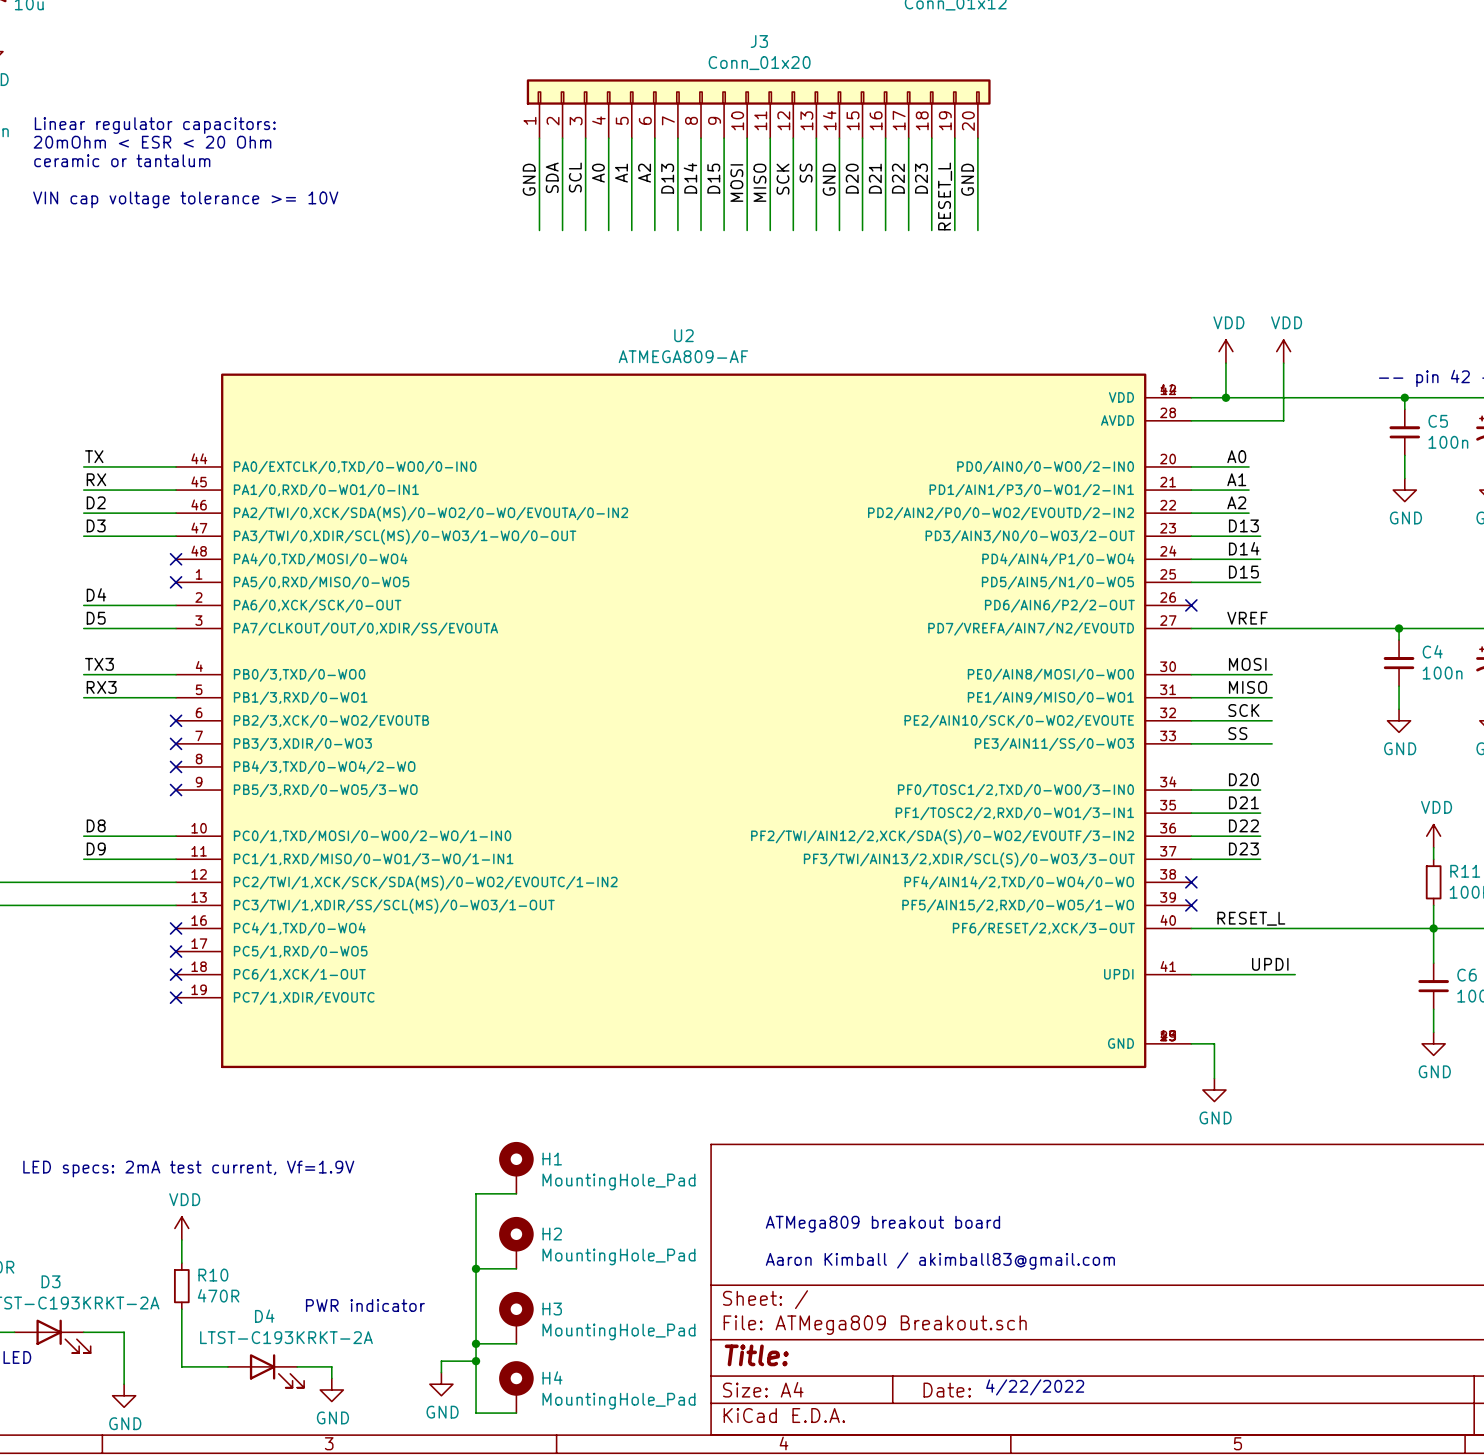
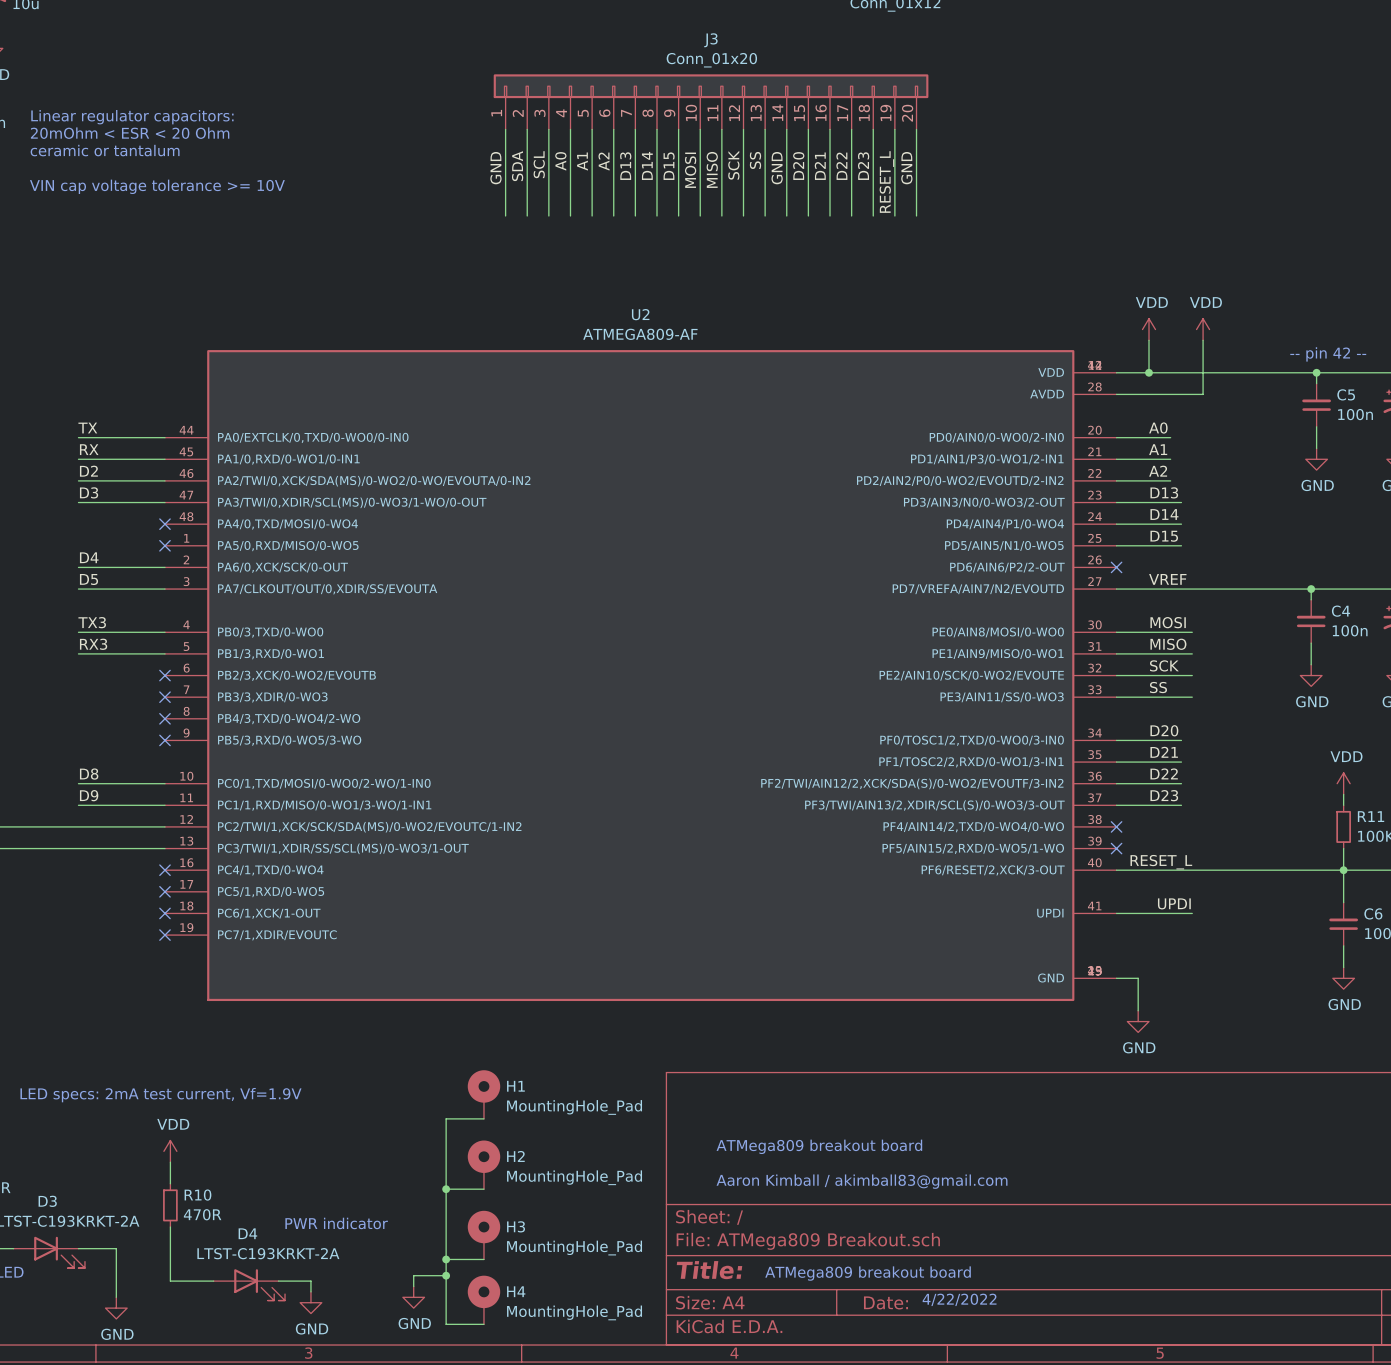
label position: RESET_L (1251, 918) -> RESET_L (1161, 862)
label position: UPDI (1270, 964) -> UPDI (1174, 903)
wire: (1272, 974) (1295, 974) -> none
text: none -> ATMega809 breakout board (868, 1273)

